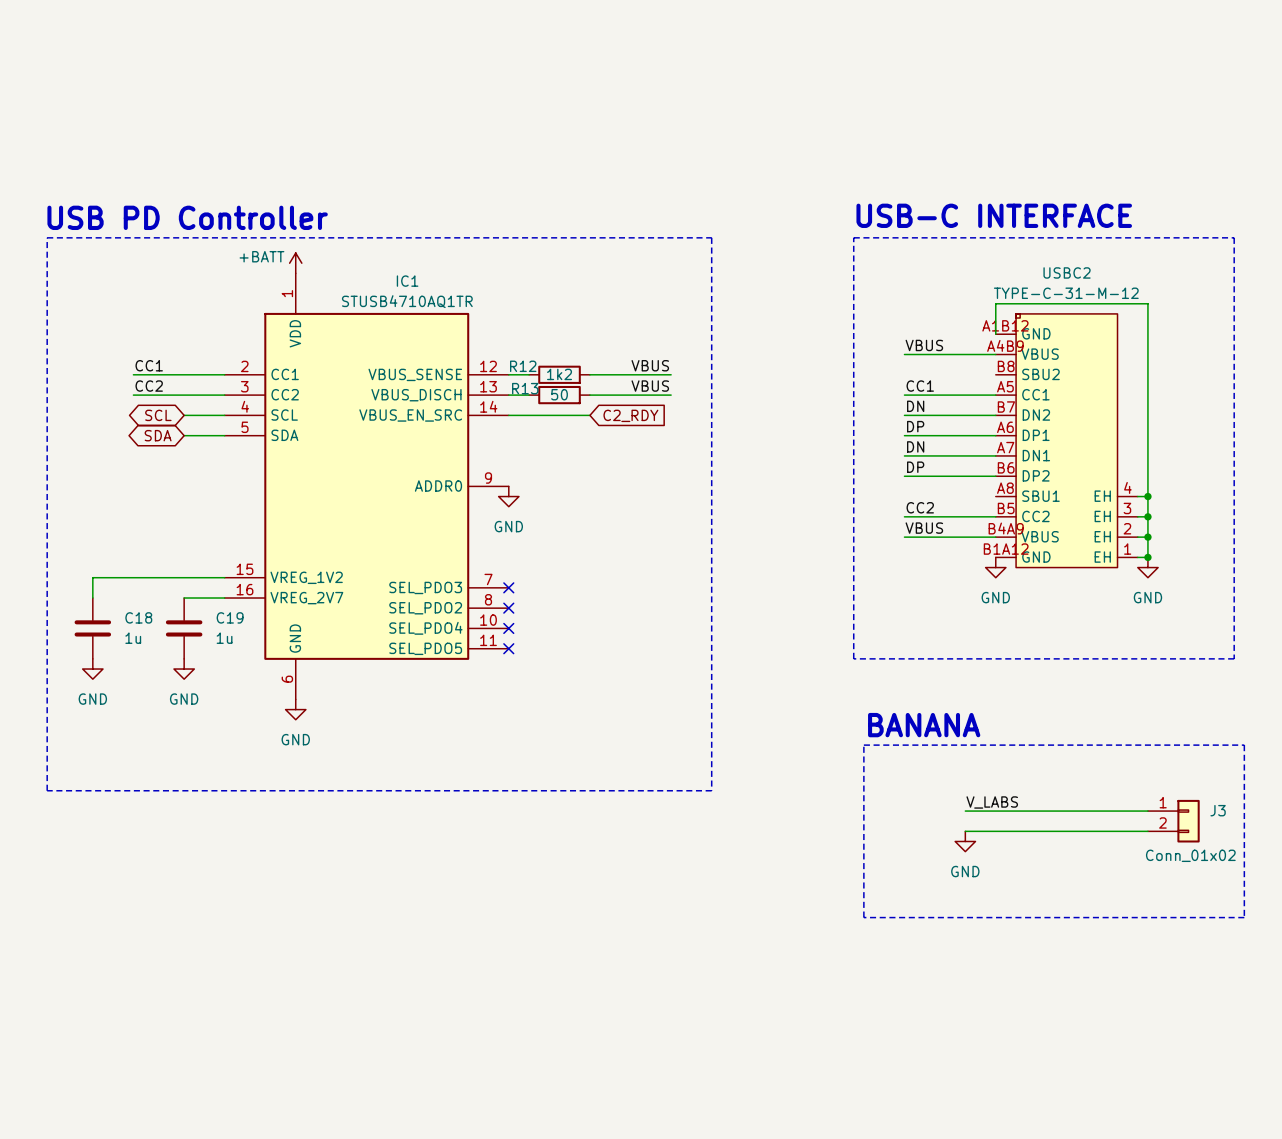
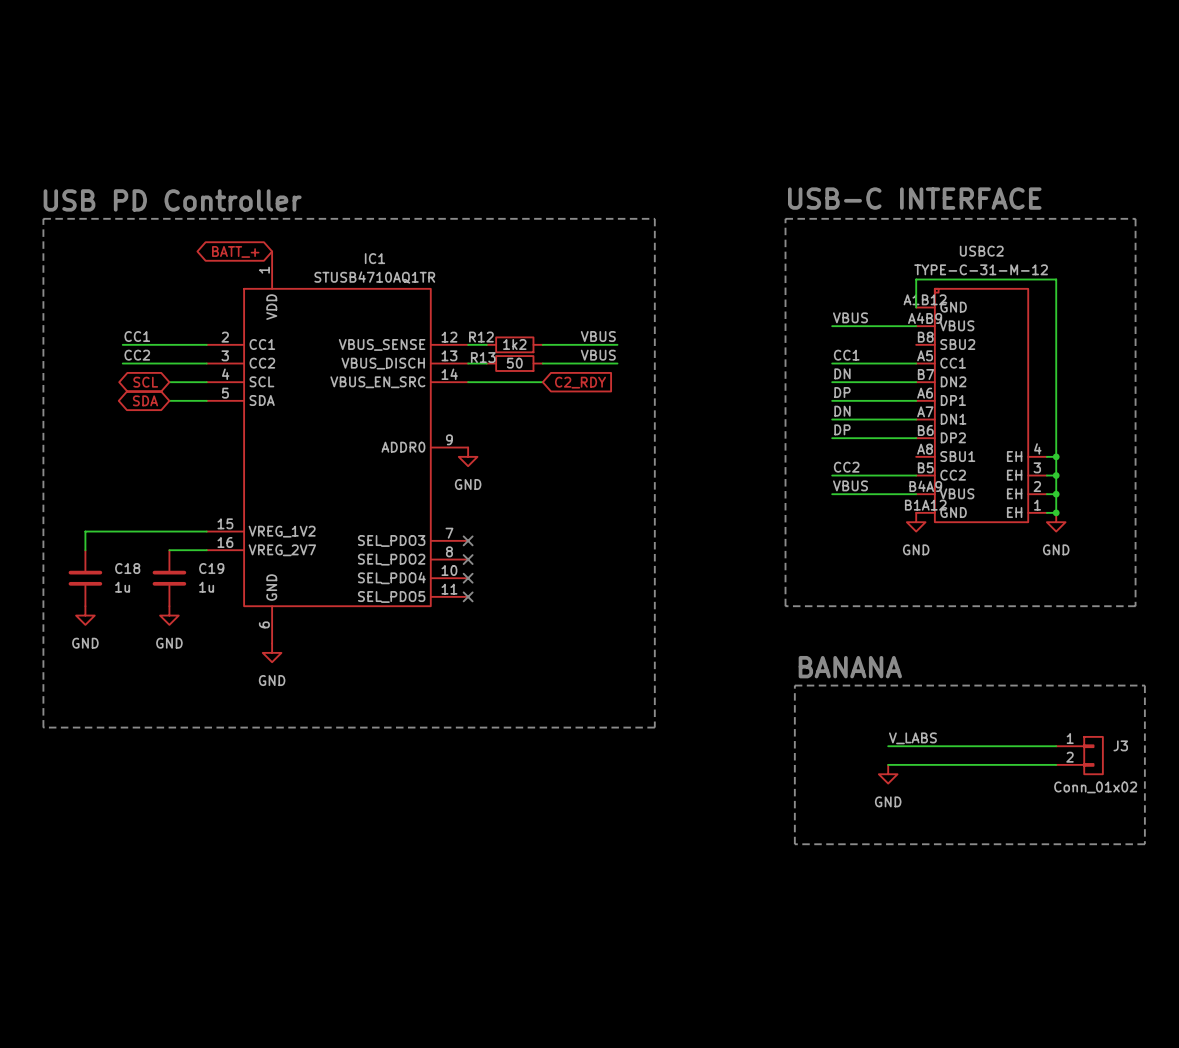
power symbol: +BATT (295, 263) -> none
global label: none -> BATT_+ (235, 251)

